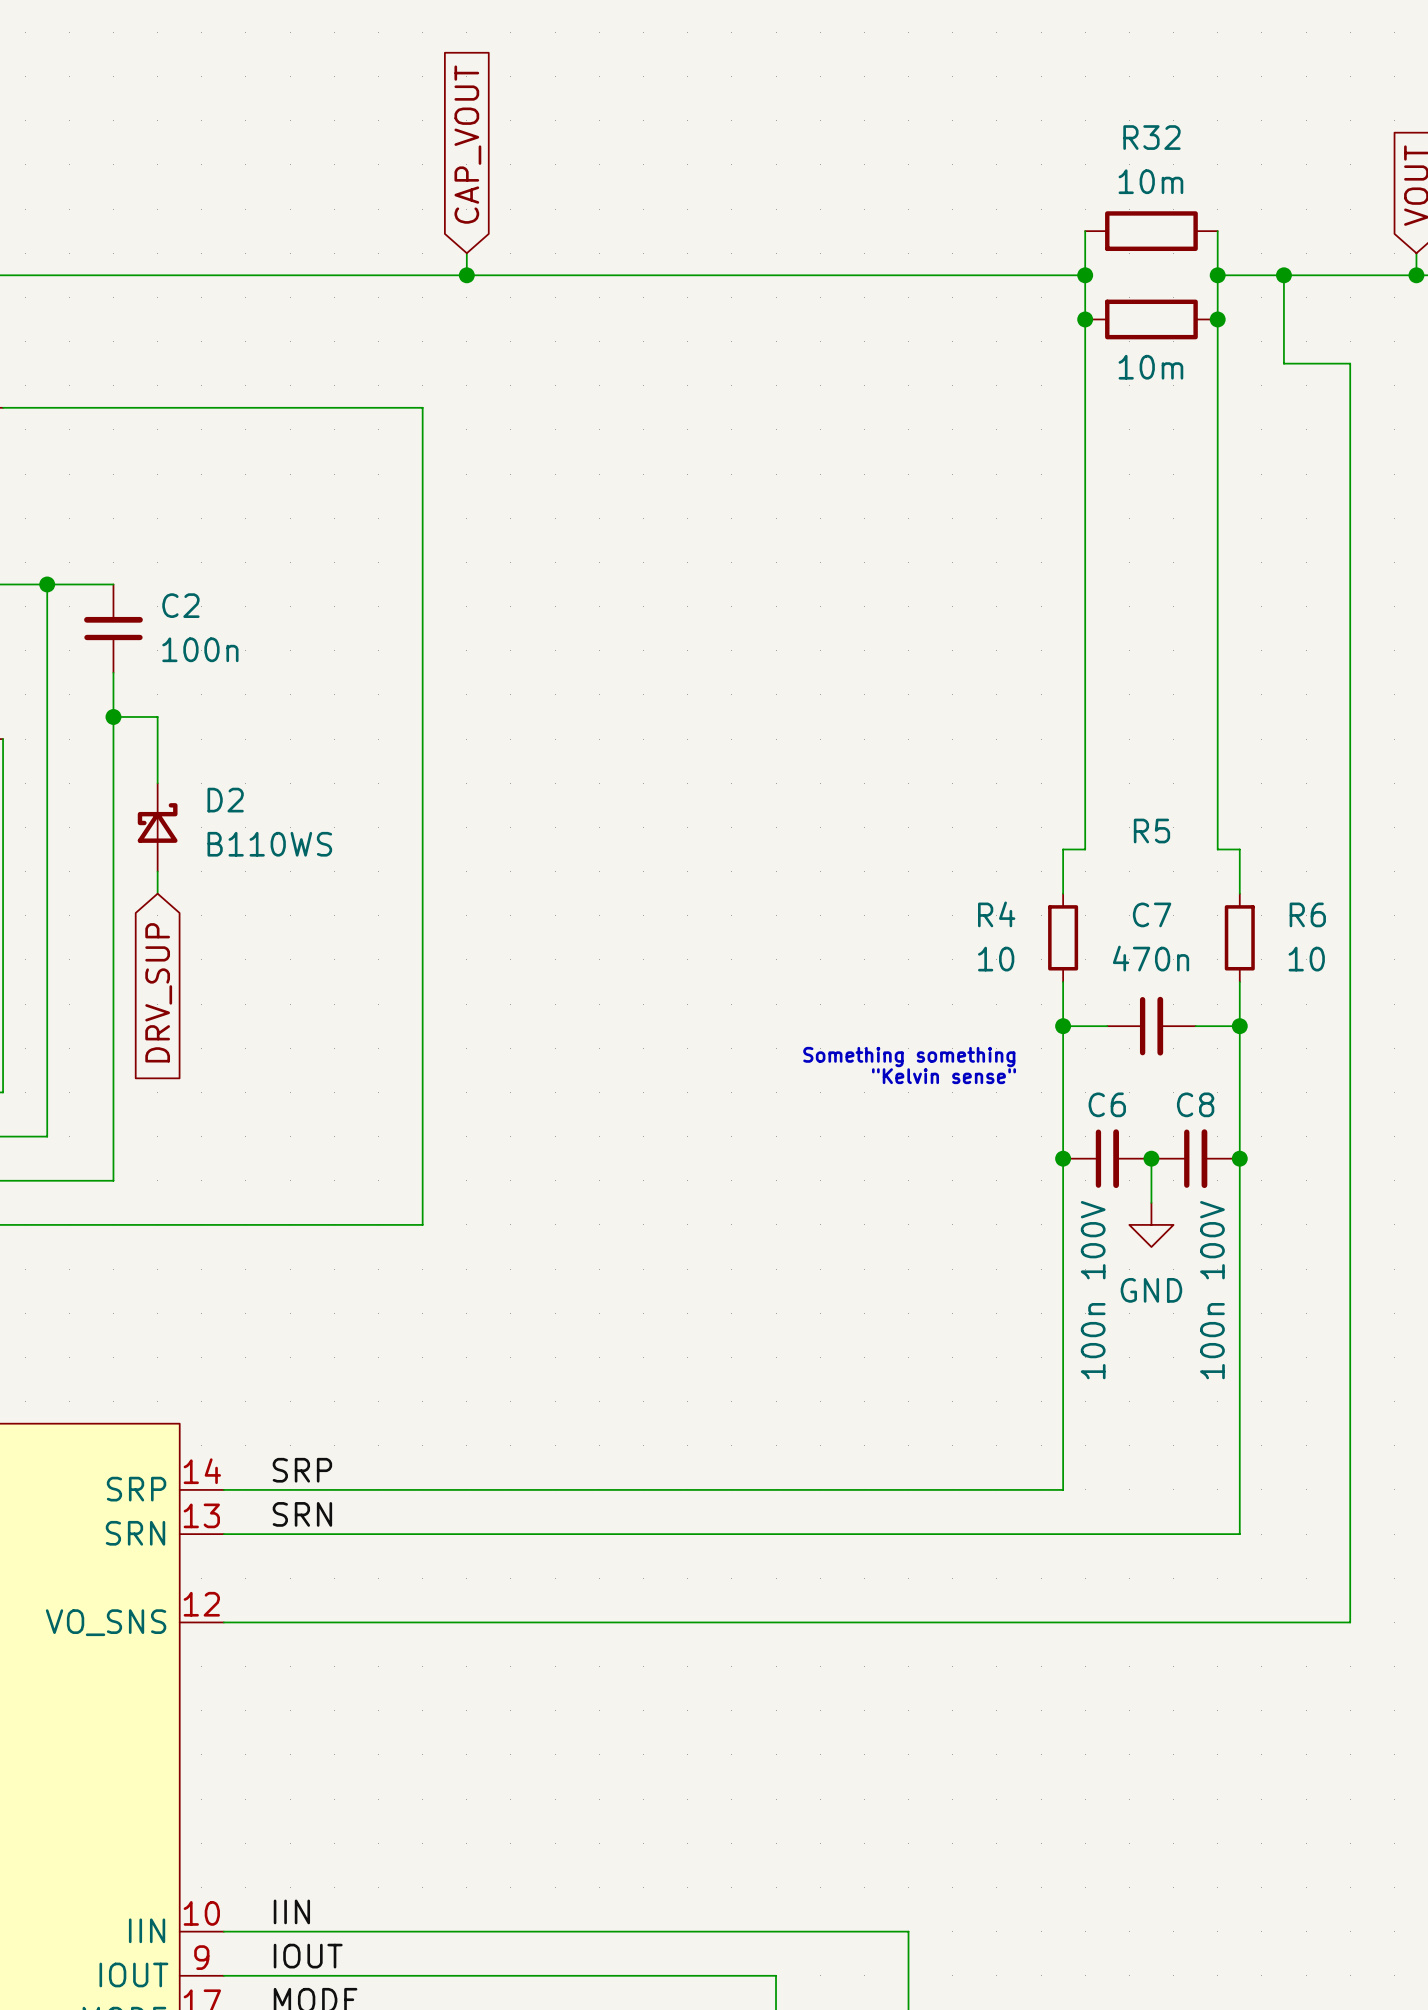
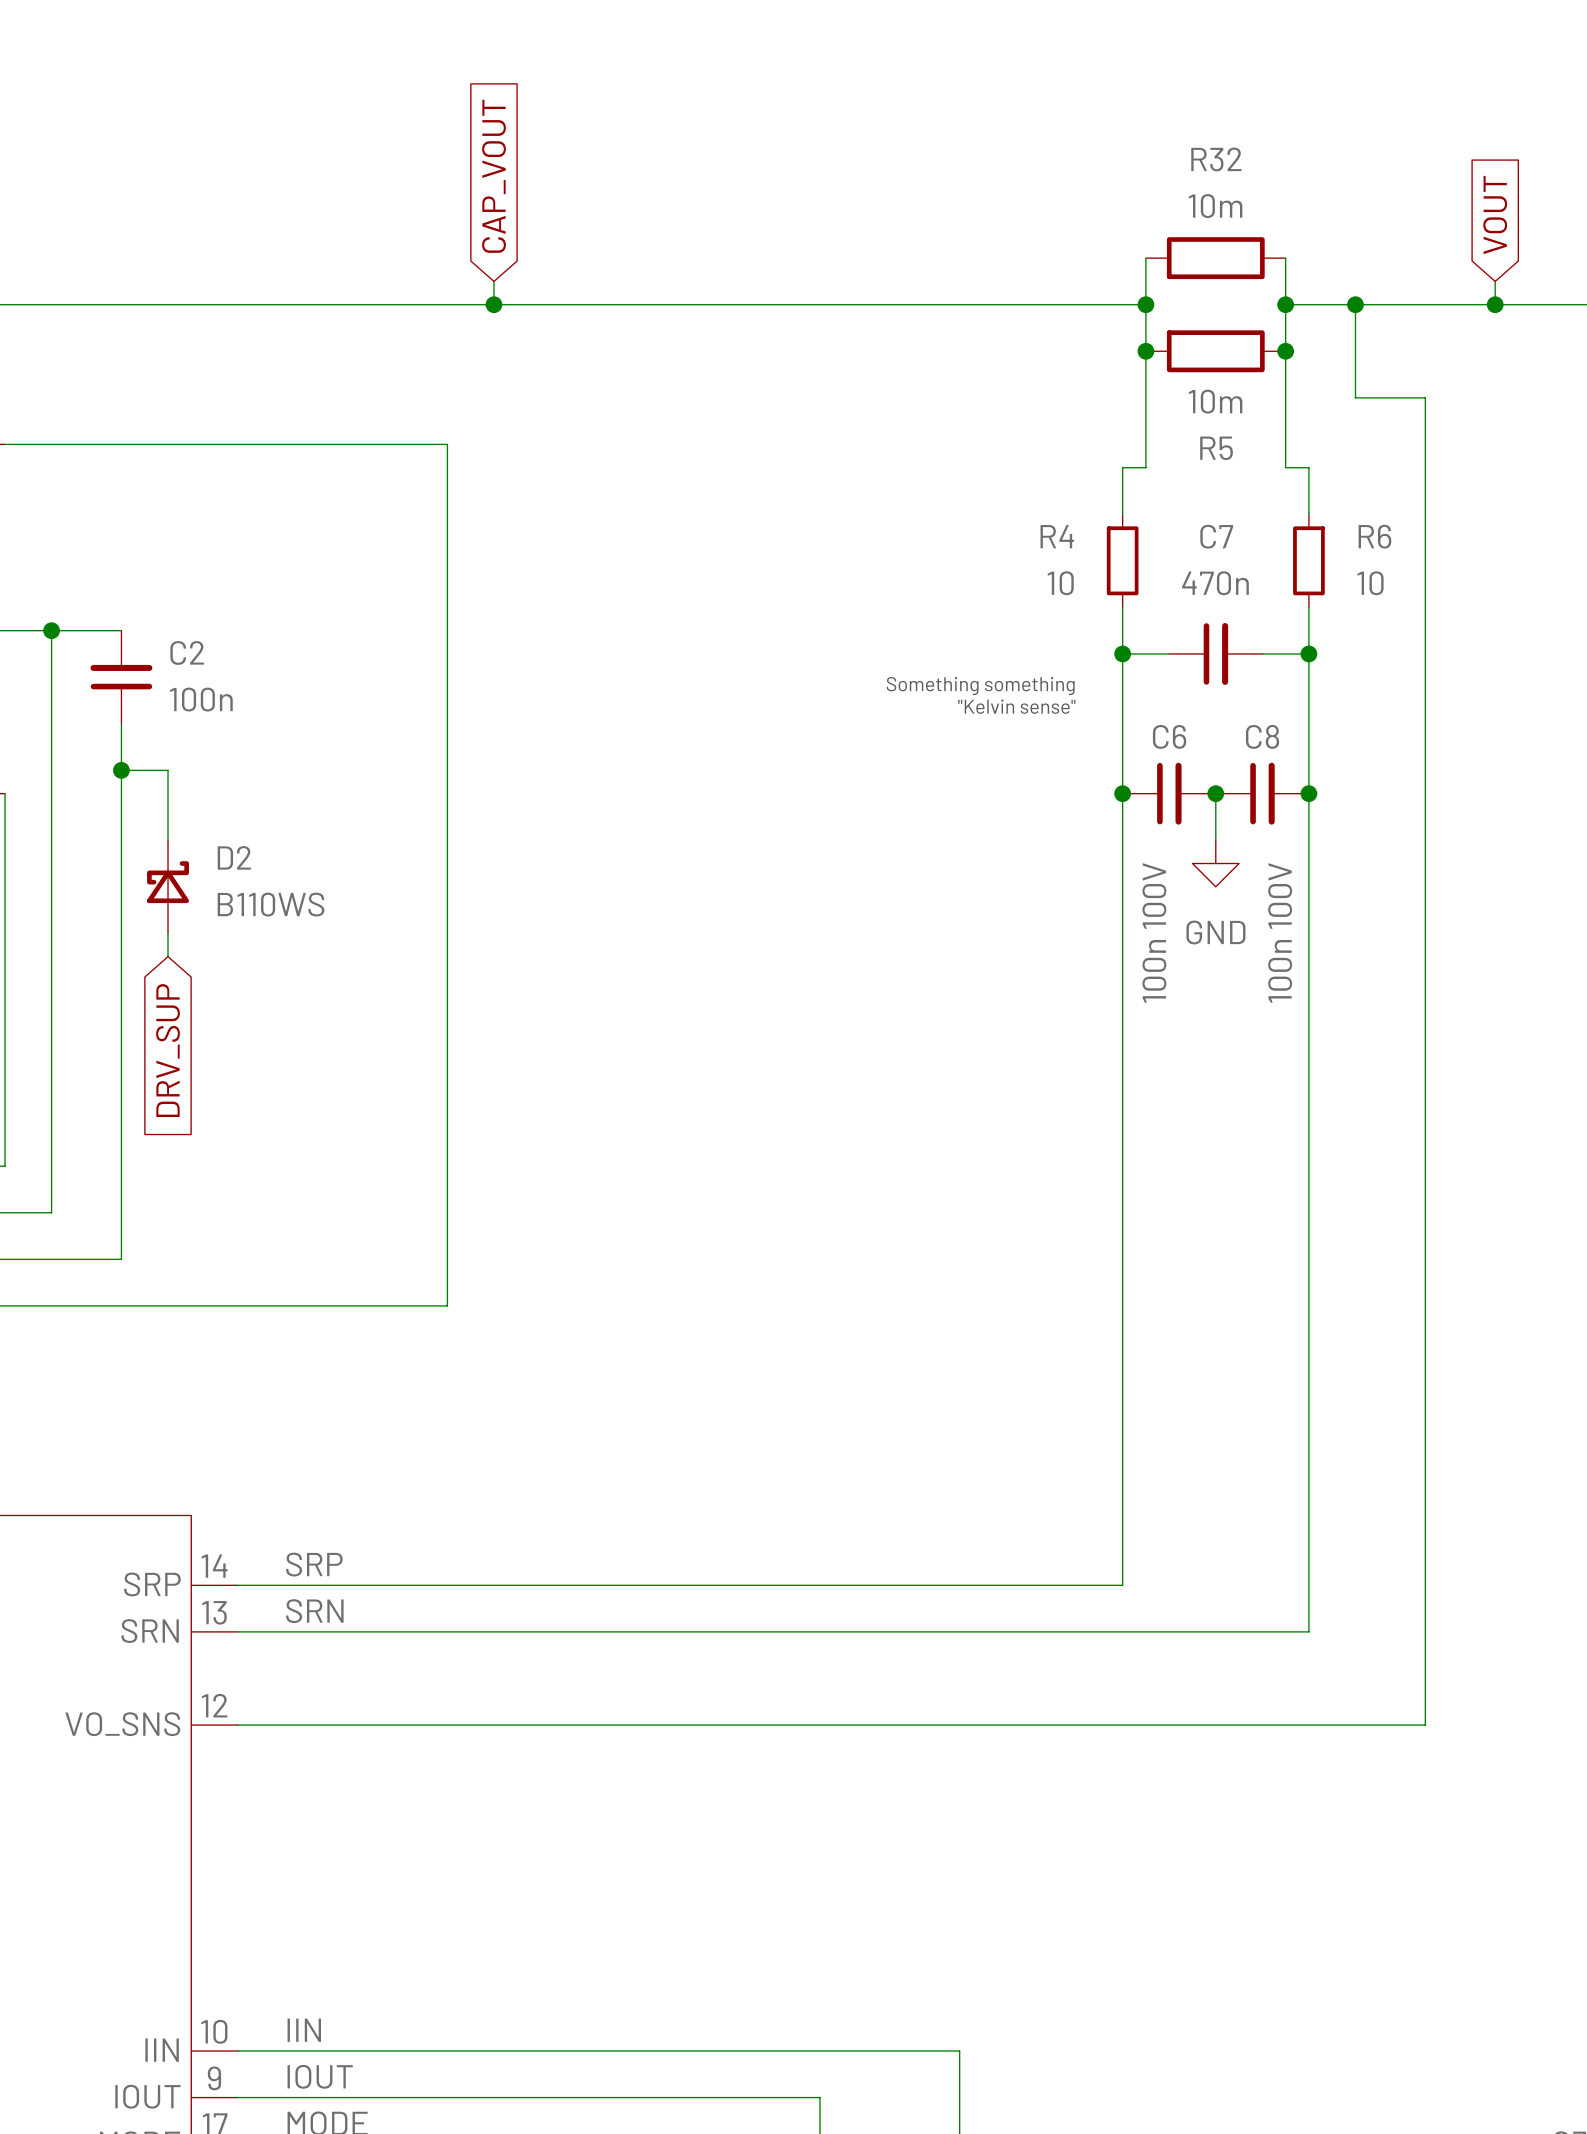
wire: (1085, 429) (1085, 849) (1063, 849) -> (1122, 607) (1122, 910)
wire: none -> (1145, 467) (1122, 467) (1122, 514)
wire: (1217, 429) (1217, 849) (1239, 849) -> (1308, 607) (1308, 910)
wire: none -> (1285, 467) (1308, 467) (1308, 514)
junction: none -> (1122, 653)
junction: none -> (1308, 653)
junction: none -> (1122, 793)
junction: none -> (1215, 793)
junction: none -> (1308, 793)
R5 name position: R5 (1151, 831) -> R5 (1216, 448)
wire: none -> (1122, 956) (1122, 1049)
wire: none -> (1308, 956) (1308, 1049)
R4 position: (1063, 937) -> (1122, 560)
R6 position: (1239, 937) -> (1308, 560)
wire: (1063, 1026) (1107, 1026) -> (1122, 653) (1169, 653)
junction: (1063, 1026) -> none
C7 position: (1151, 1026) -> (1215, 653)
wire: (1195, 1026) (1239, 1026) -> (1262, 653) (1308, 653)
junction: (1239, 1026) -> none
text position: Something something (909, 1057) -> Something something (980, 686)
text position: "Kelvin sense" (944, 1076) -> "Kelvin sense" (1016, 706)
junction: (1063, 1158) -> none
C6 position: (1107, 1158) -> (1169, 793)
wire: (1151, 1158) (1151, 1202) -> (1215, 793) (1215, 840)
junction: (1151, 1158) -> none
C8 position: (1195, 1158) -> (1262, 793)
junction: (1239, 1158) -> none
power symbol position: GND (1151, 1224) -> GND (1215, 863)

